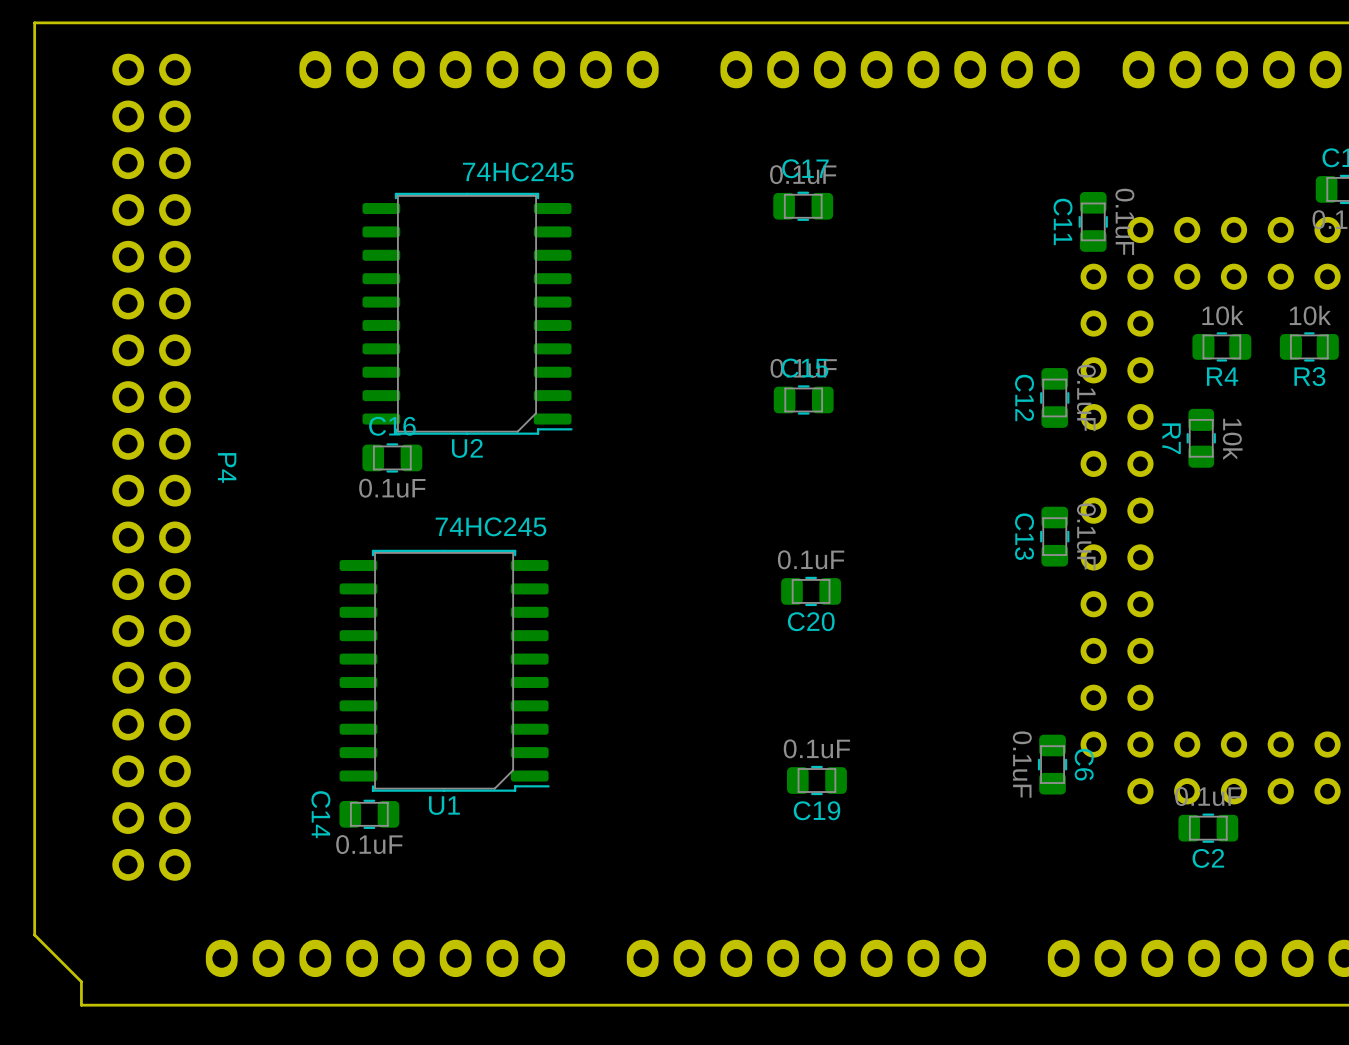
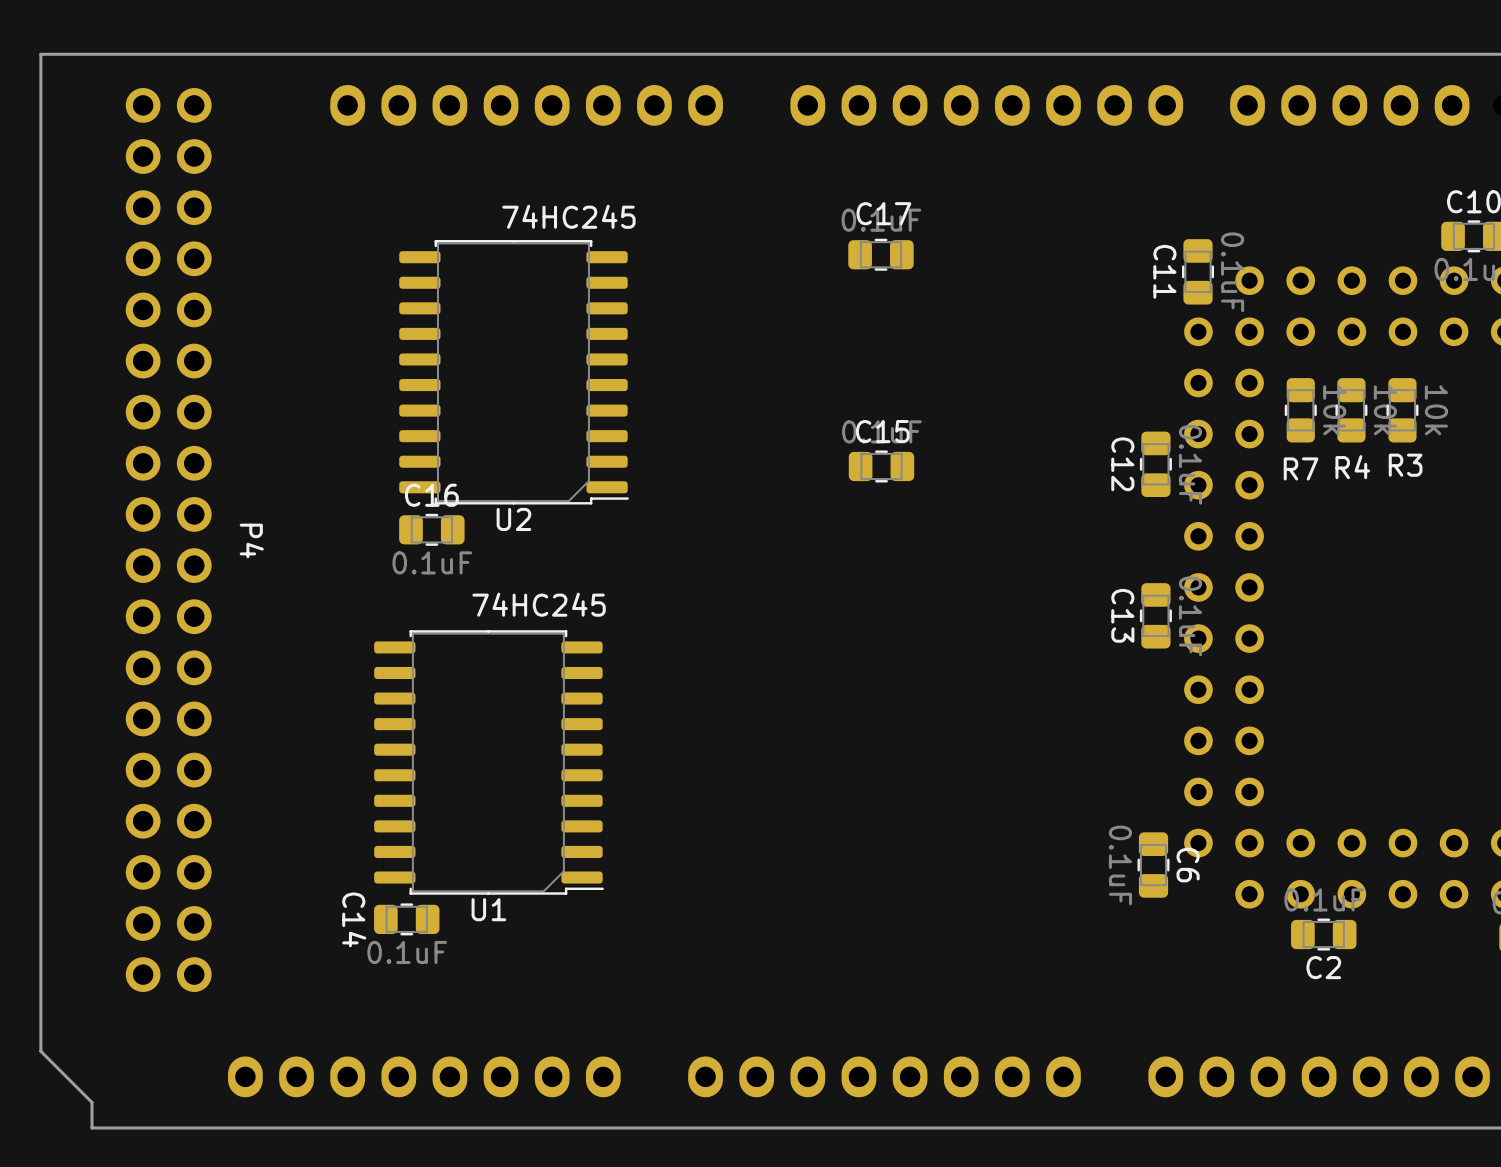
R4 rotation: 0° (1221, 346) -> 90° clockwise (1351, 410)
R3 rotation: 0° (1309, 346) -> 90° clockwise (1402, 410)
R7 name rotation: 0° (1171, 438) -> 90° counterclockwise (1301, 468)
R7 position: (1201, 438) -> (1300, 410)
C20: 0.1uF (811, 591) -> none
C19: 0.1uF (816, 780) -> none

